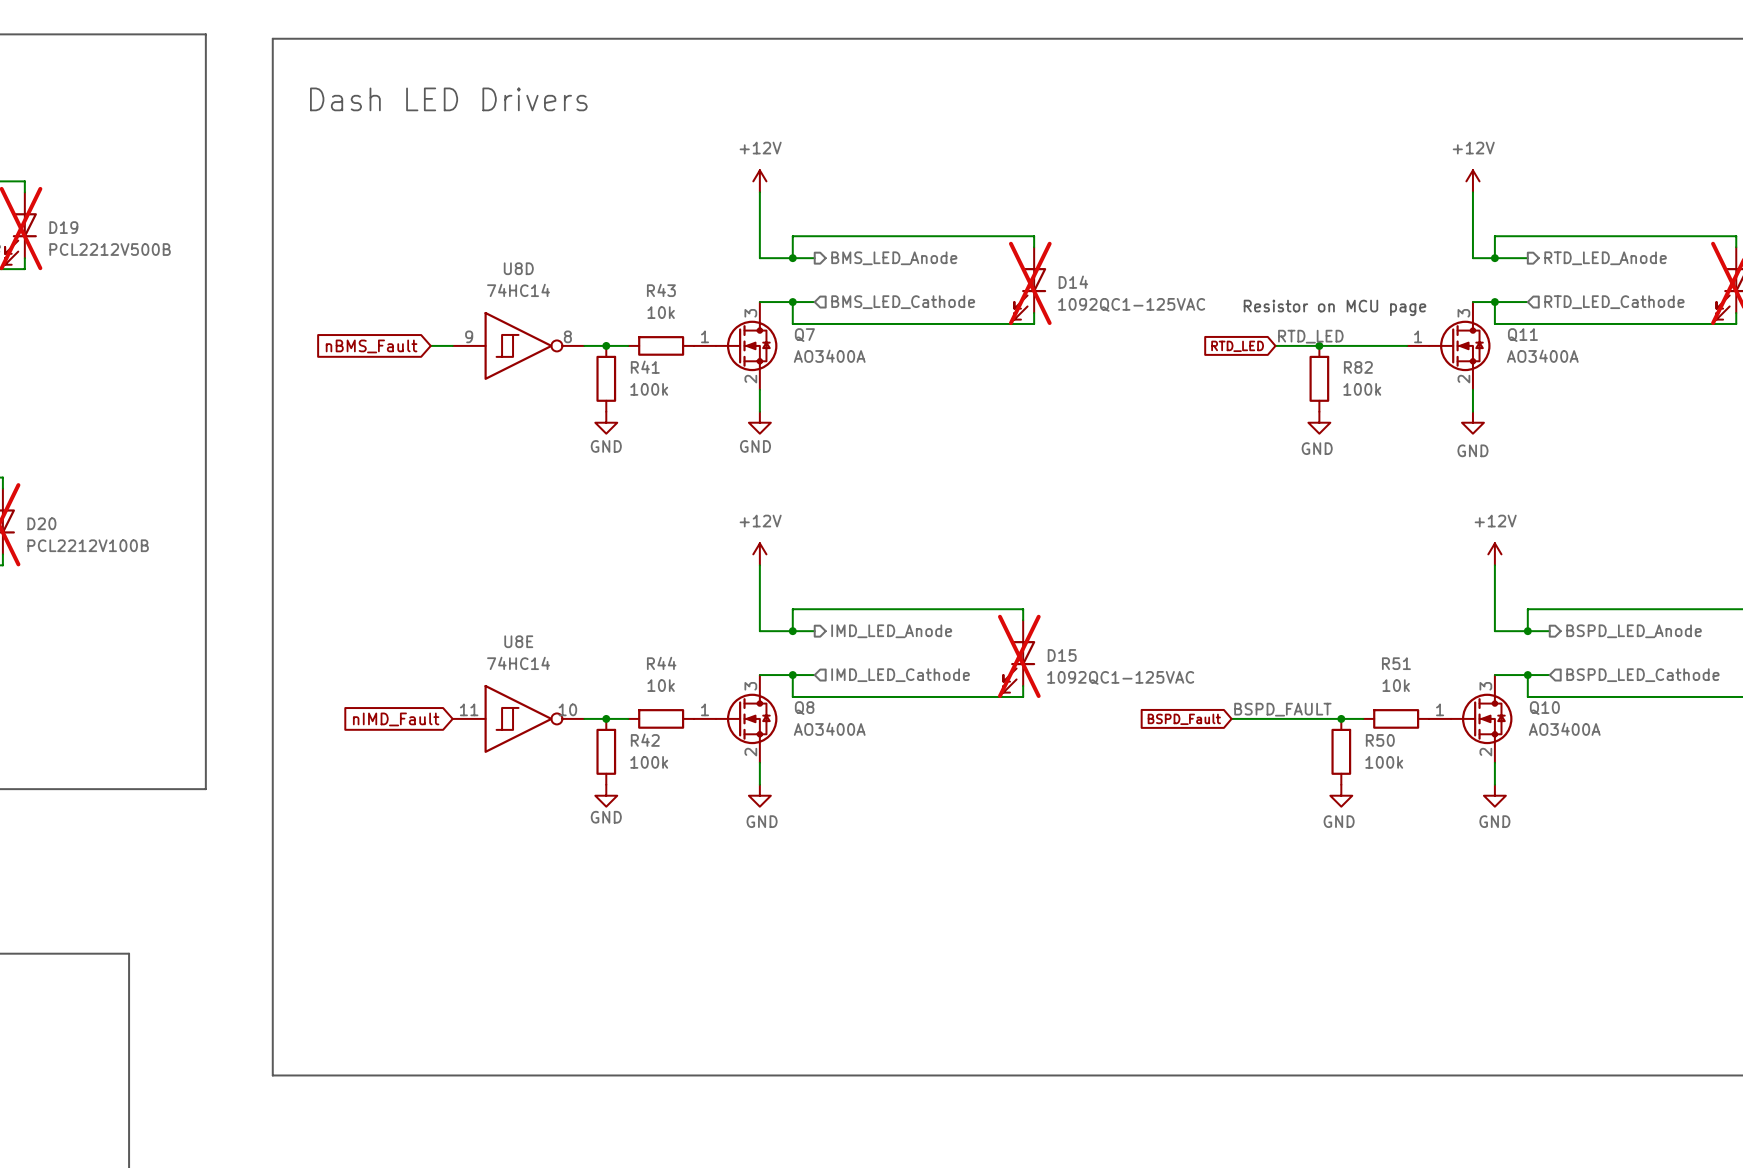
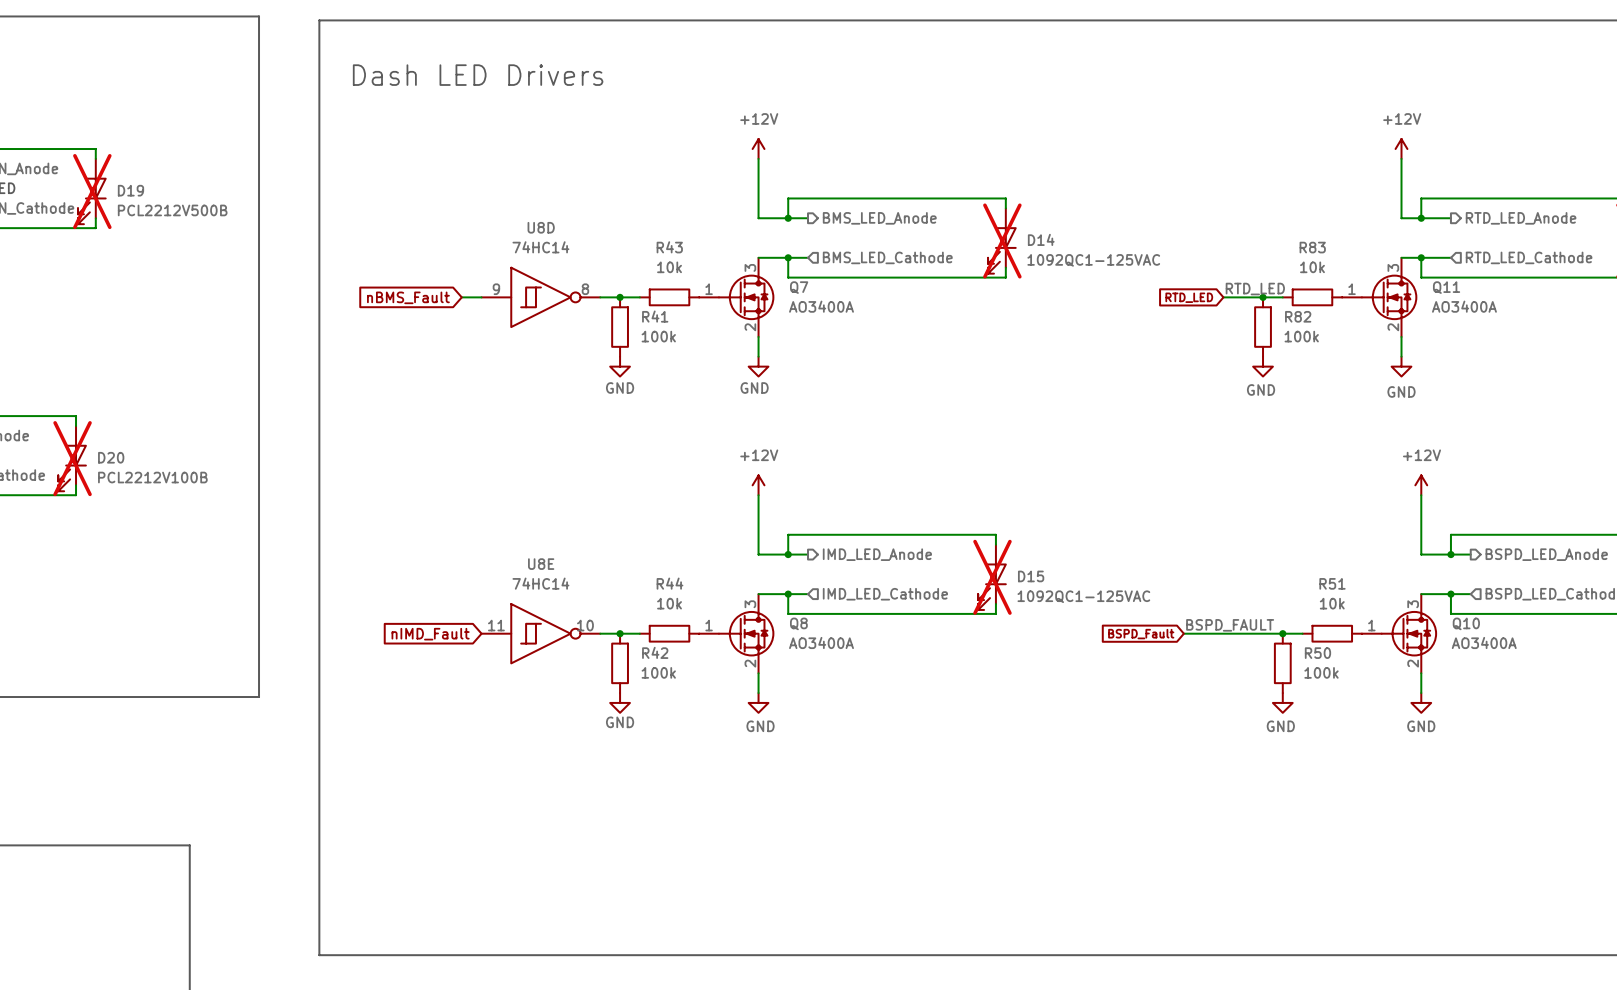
text: Resistor on MCU page (1334, 307) -> none
wire: (1341, 345) (1407, 345) -> none
R83: none -> 10k (1312, 297)

